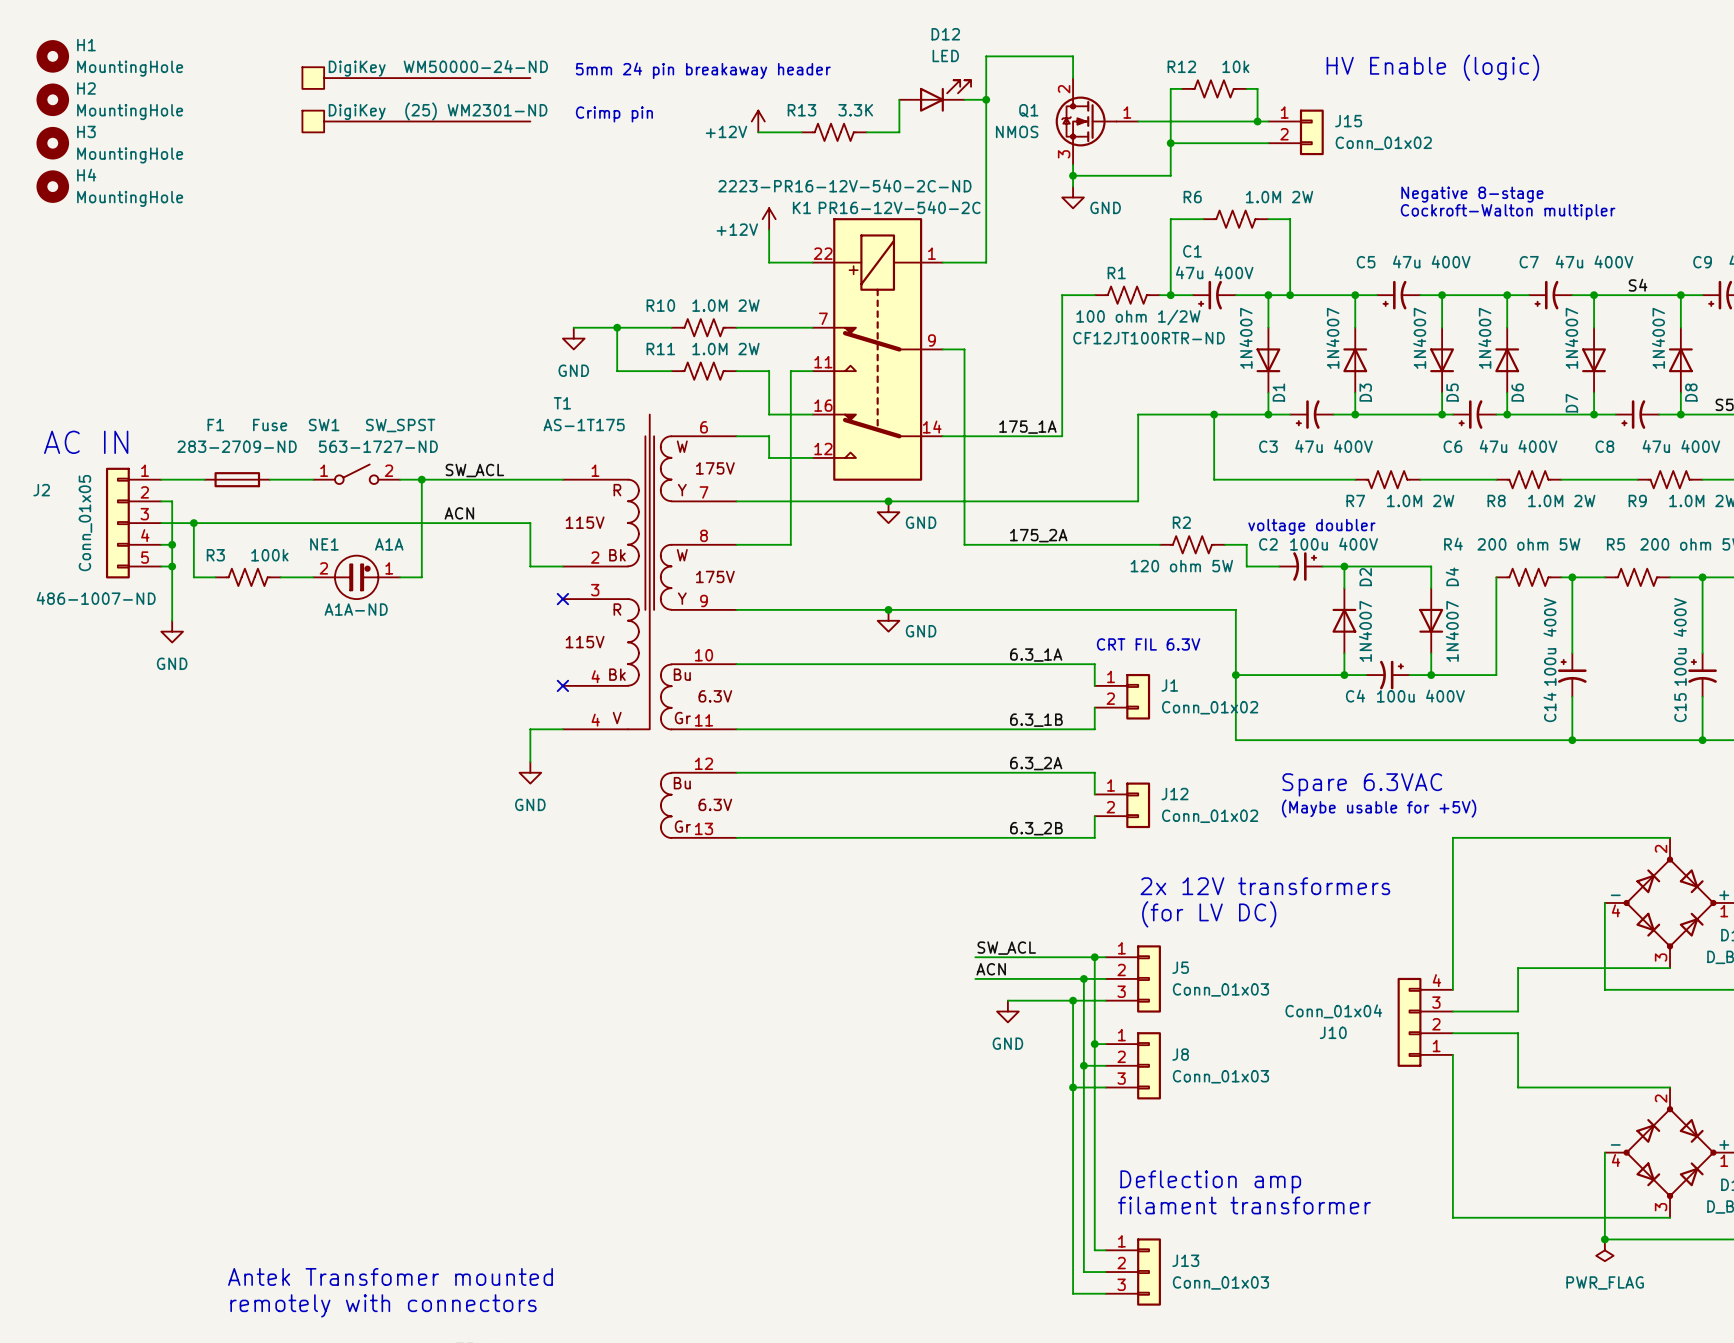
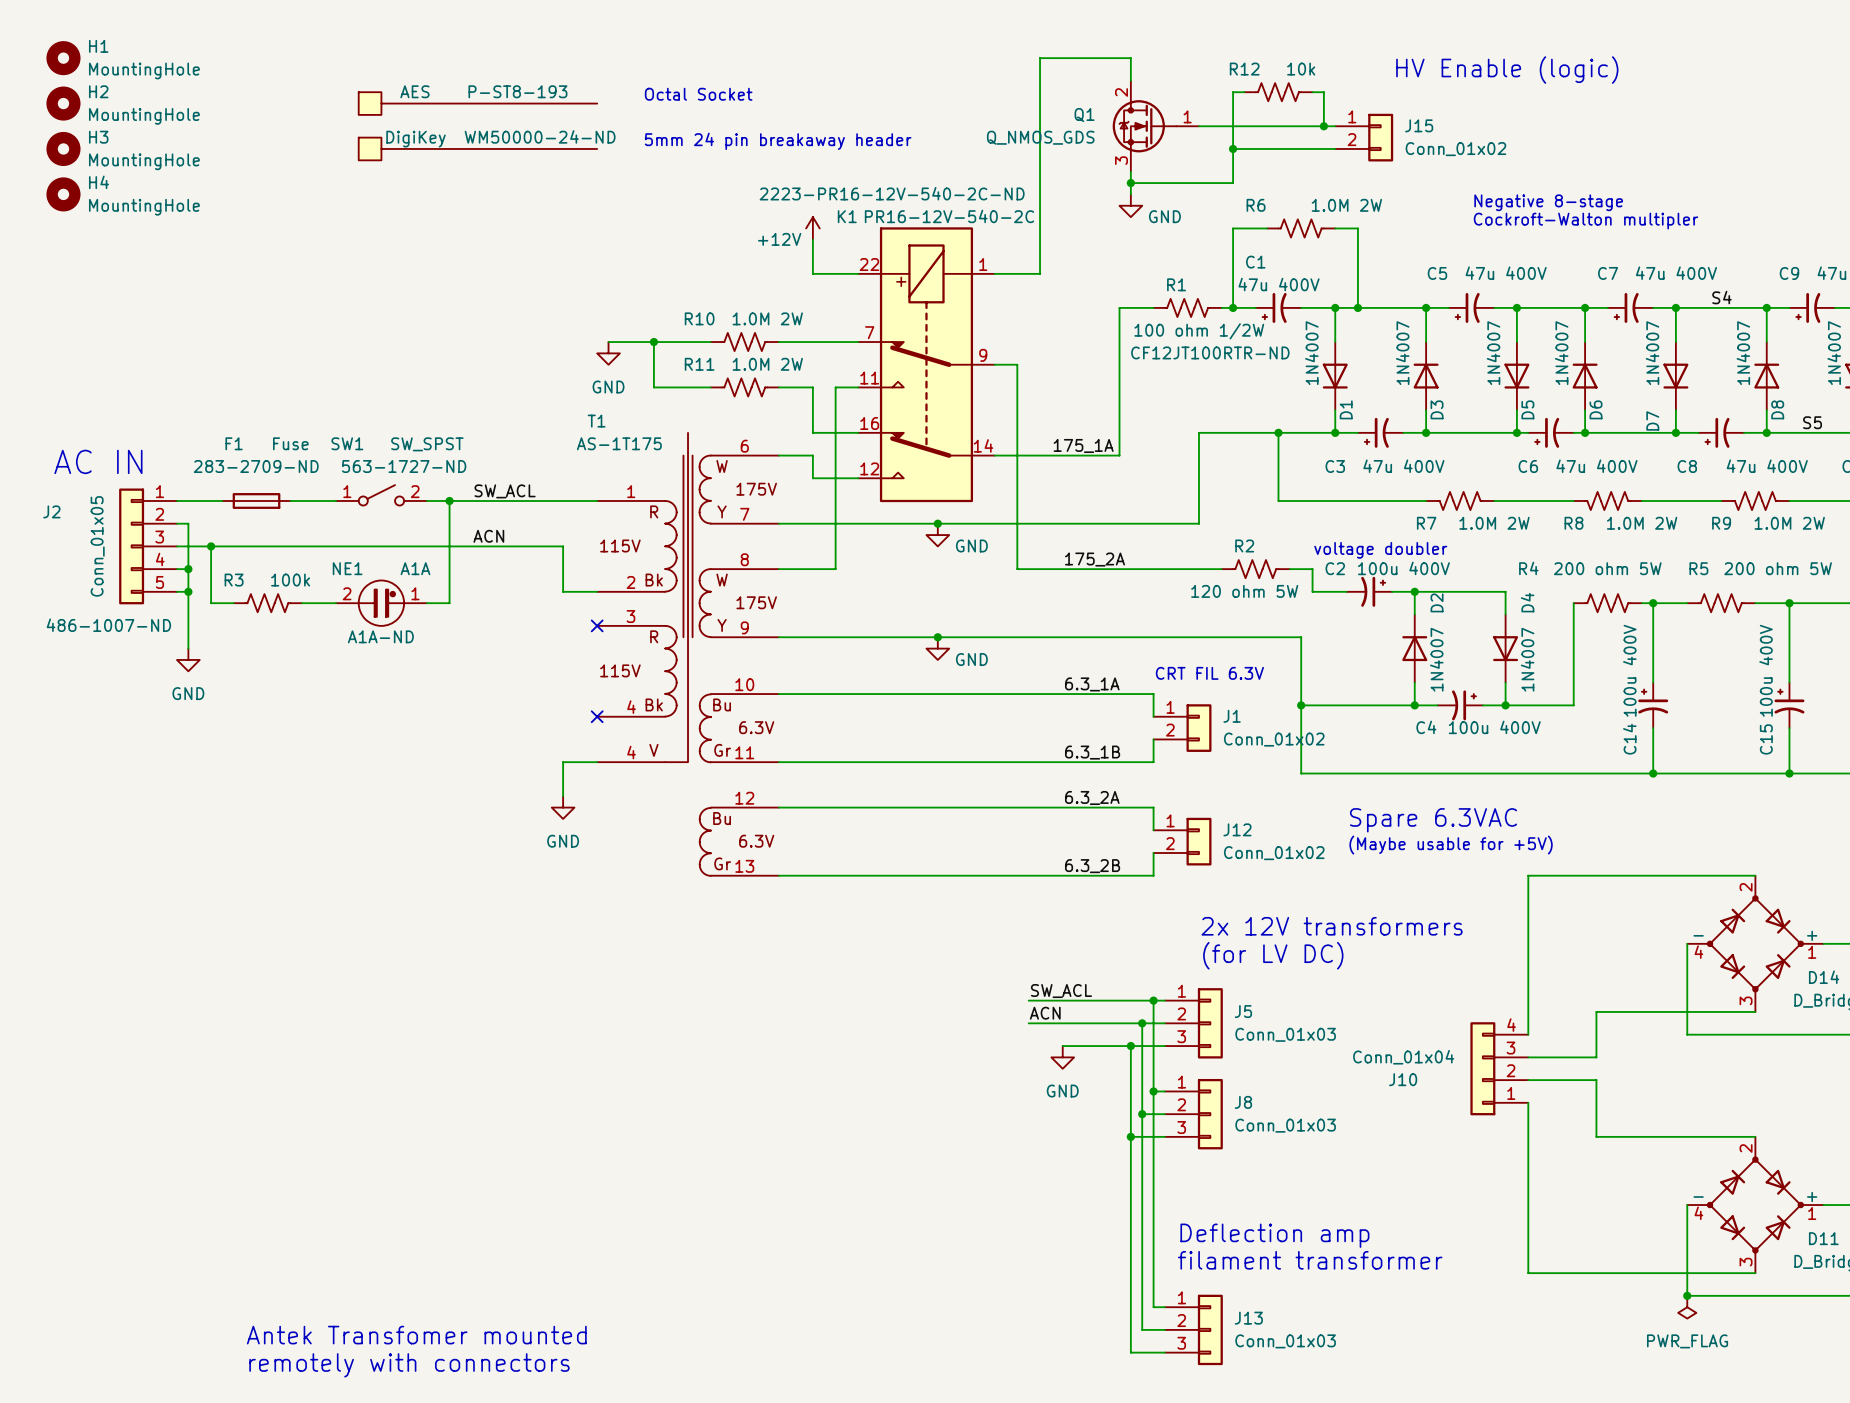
text position: 5mm 24 pin breakaway header (703, 70) -> 5mm 24 pin breakaway header (778, 141)
part position: (416, 78) -> (477, 148)
text: none -> Octal Socket (698, 94)
D12: LED (935, 95) -> none
part: none -> (477, 103)
wire: (899, 99) (899, 132) (866, 132) -> none
wire: (964, 99) (986, 99) -> none
junction: (986, 99) -> none
text: Crimp pin (614, 114) -> none
part: (416, 121) -> none
power symbol: +12V (758, 121) -> none
Q1 value: NMOS (1017, 131) -> Q_NMOS_GDS (1040, 137)
wire: (758, 132) (801, 132) -> none
R13: 3.3K (834, 132) -> none

